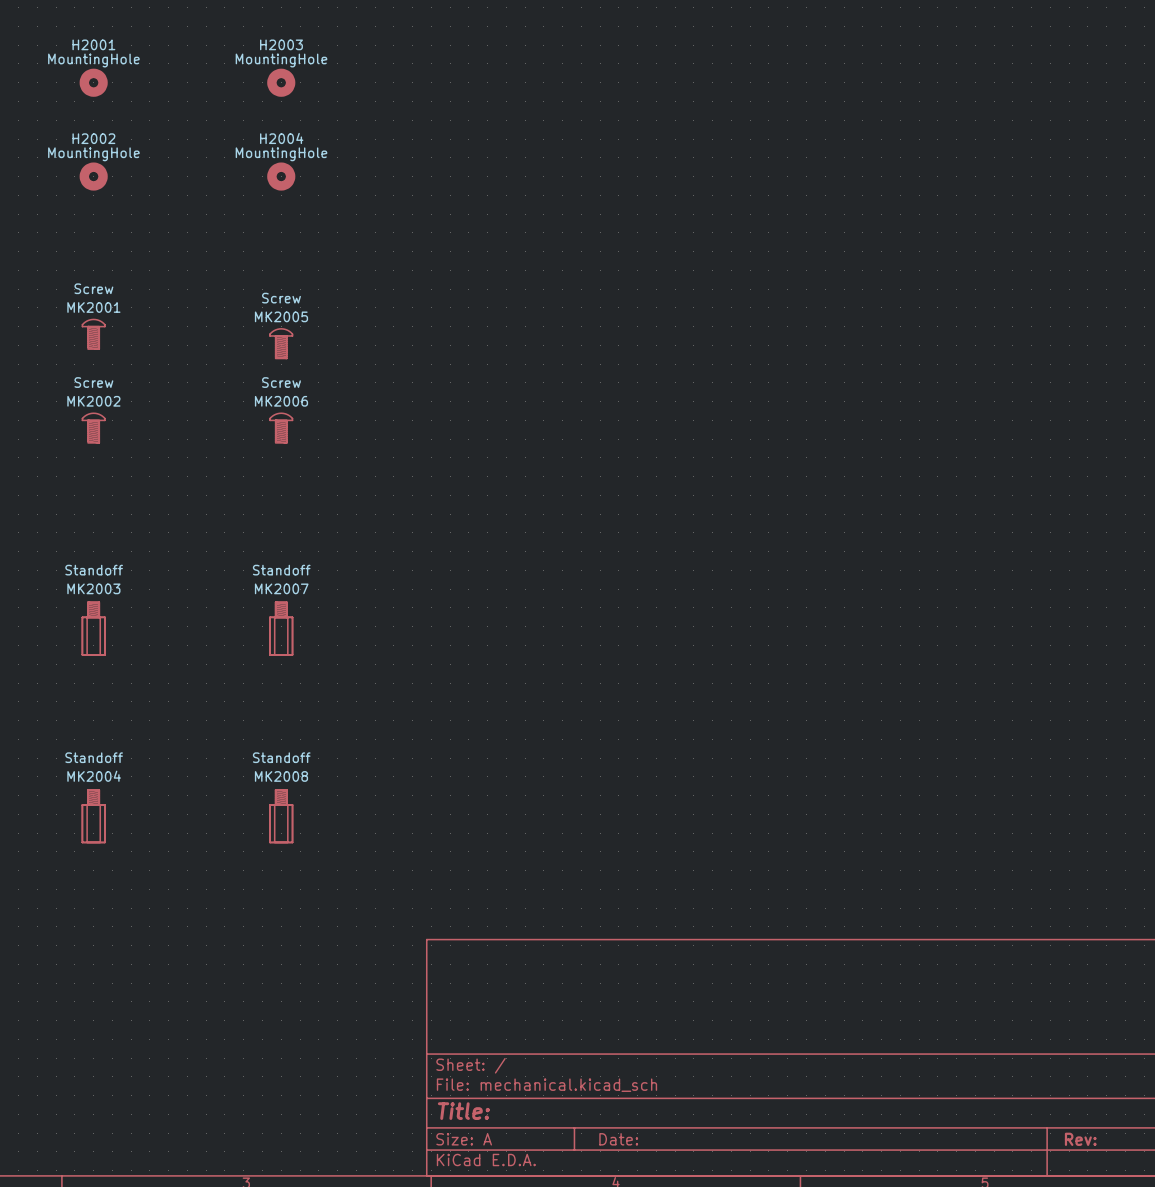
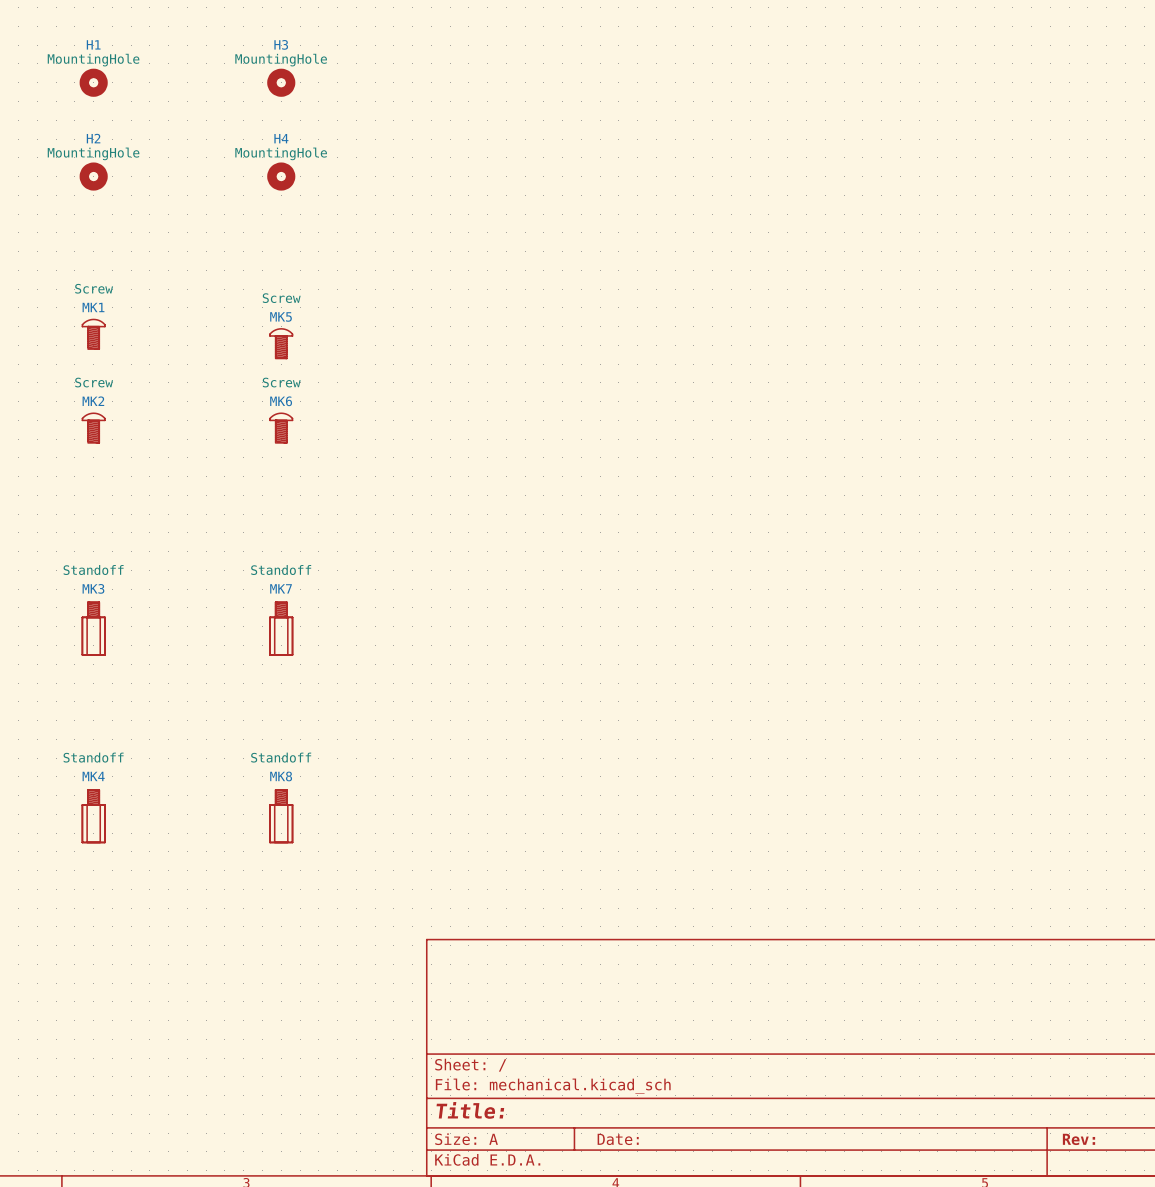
H2001 name: H2001 (93, 44) -> H1 (93, 44)
H2003 name: H2003 (281, 44) -> H3 (281, 44)
H2002 name: H2002 (93, 138) -> H2 (93, 138)
H2004 name: H2004 (281, 138) -> H4 (281, 138)
MK2001 name: MK2001 (93, 307) -> MK1 (93, 307)
MK2005 name: MK2005 (281, 316) -> MK5 (281, 316)
MK2002 name: MK2002 (93, 401) -> MK2 (93, 401)
MK2006 name: MK2006 (281, 401) -> MK6 (281, 401)
MK2003 name: MK2003 (93, 588) -> MK3 (93, 588)
MK2007 name: MK2007 (281, 588) -> MK7 (281, 588)
MK2004 name: MK2004 (94, 776) -> MK4 (93, 776)
MK2008 name: MK2008 (281, 776) -> MK8 (281, 776)

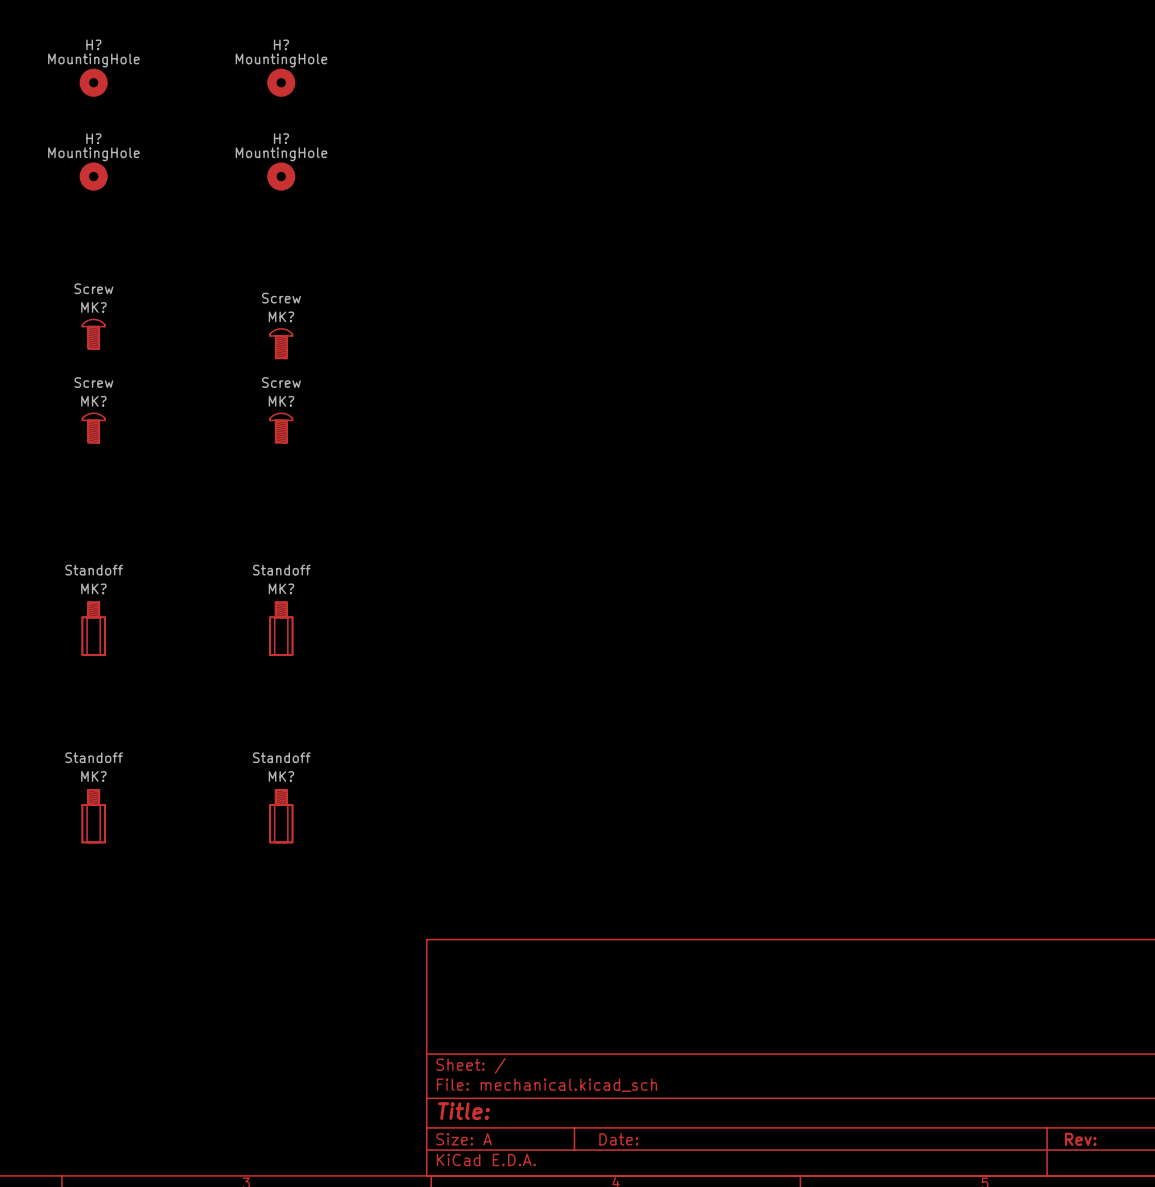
H1 name: H1 (93, 44) -> H? (93, 44)
H3 name: H3 (281, 44) -> H? (281, 44)
H2 name: H2 (93, 138) -> H? (93, 138)
H4 name: H4 (281, 138) -> H? (281, 138)
MK1 name: MK1 (93, 307) -> MK? (93, 307)
MK5 name: MK5 (281, 316) -> MK? (281, 316)
MK2 name: MK2 (93, 401) -> MK? (93, 401)
MK6 name: MK6 (281, 401) -> MK? (281, 401)
MK3 name: MK3 (93, 588) -> MK? (93, 588)
MK7 name: MK7 (281, 588) -> MK? (281, 588)
MK4 name: MK4 (93, 776) -> MK? (93, 776)
MK8 name: MK8 (281, 776) -> MK? (281, 776)

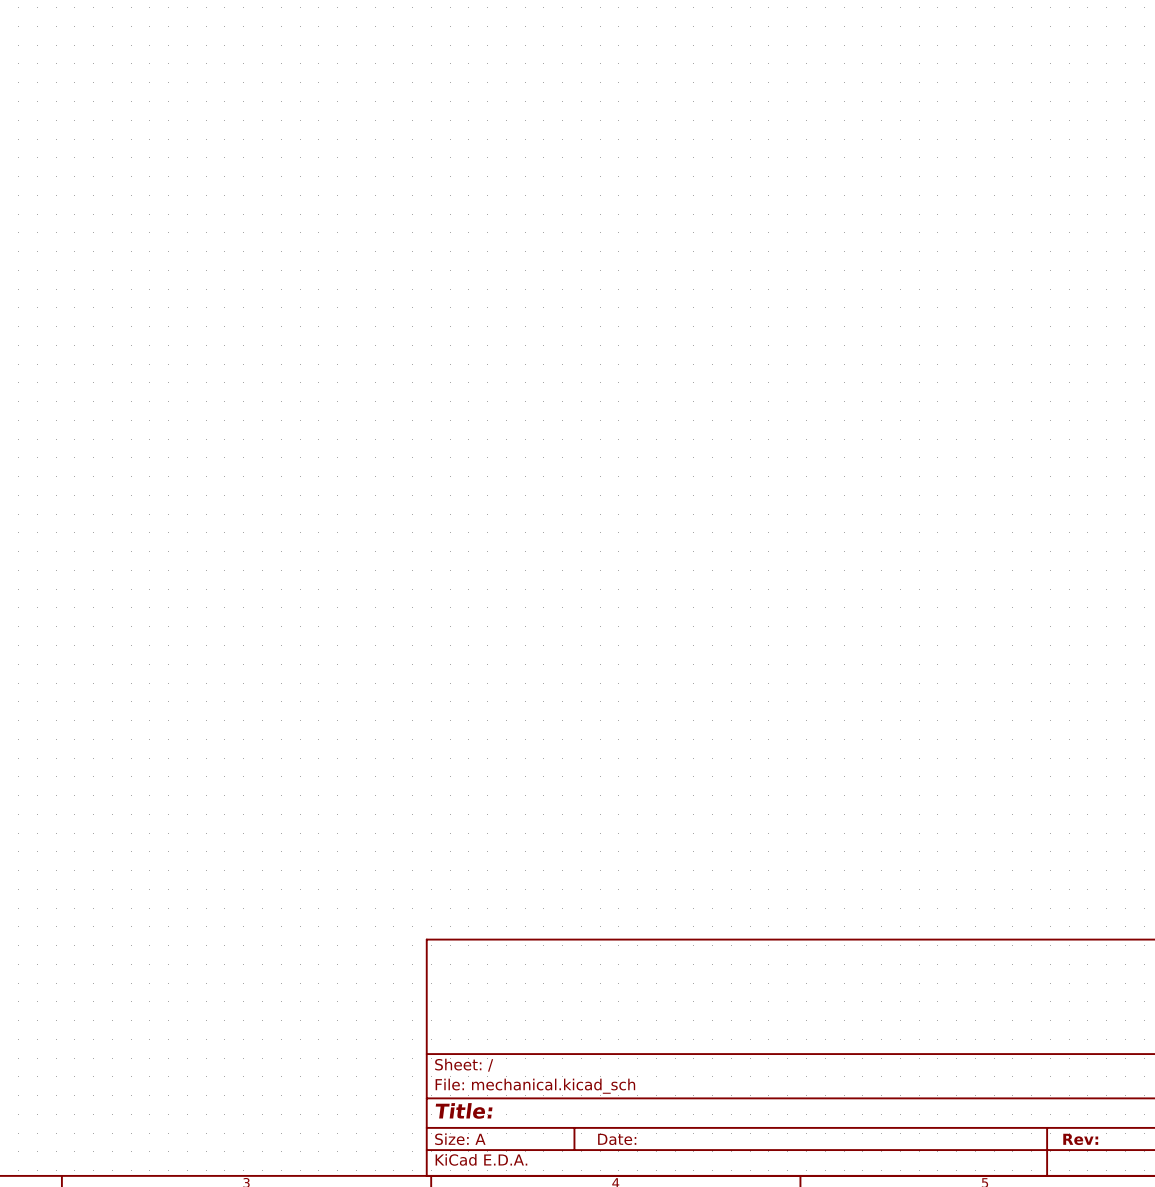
H?: MountingHole (93, 82) -> none
H?: MountingHole (281, 82) -> none
H?: MountingHole (93, 176) -> none
H?: MountingHole (281, 176) -> none
MK?: Screw (93, 334) -> none
MK?: Screw (281, 343) -> none
MK?: Screw (93, 428) -> none
MK?: Screw (281, 428) -> none
MK?: Standoff (93, 628) -> none
MK?: Standoff (281, 628) -> none
MK?: Standoff (93, 816) -> none
MK?: Standoff (281, 816) -> none

